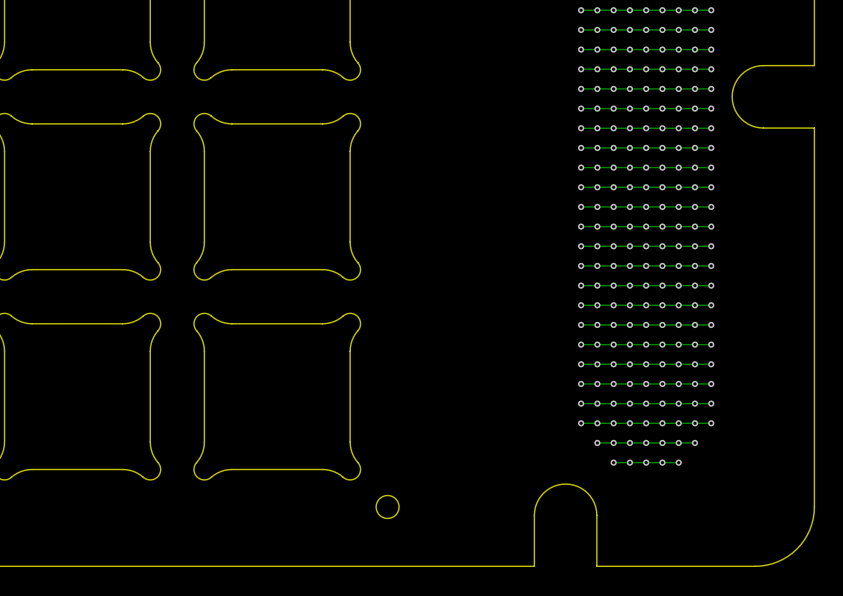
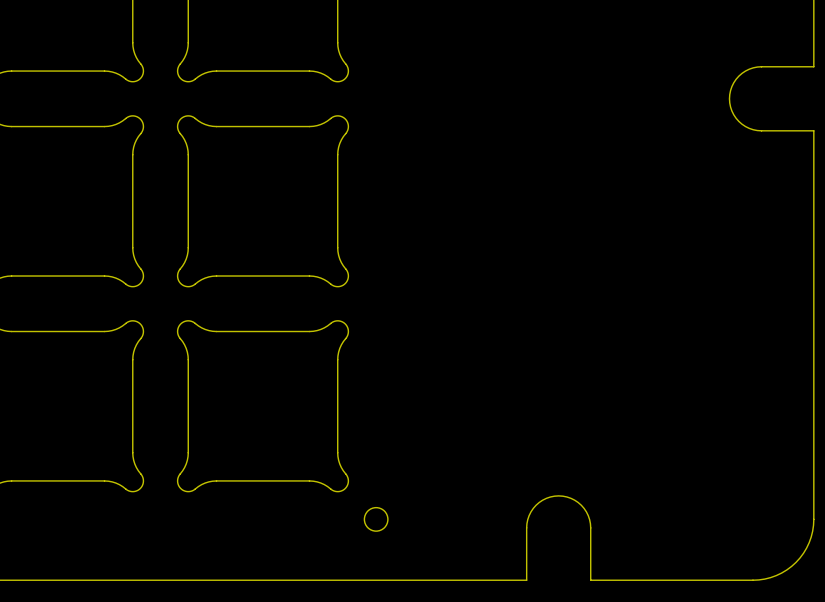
via: (581, 10) -> none
via: (597, 10) -> none
via: (613, 10) -> none
via: (629, 10) -> none
via: (646, 10) -> none
via: (662, 10) -> none
via: (678, 10) -> none
via: (694, 10) -> none
track: (711, 10) (581, 10) -> none
via: (711, 10) -> none
via: (581, 29) -> none
via: (597, 29) -> none
via: (613, 29) -> none
via: (629, 29) -> none
via: (646, 29) -> none
via: (662, 29) -> none
via: (678, 29) -> none
via: (694, 29) -> none
track: (711, 29) (581, 29) -> none
via: (711, 29) -> none
via: (581, 49) -> none
via: (597, 49) -> none
via: (613, 49) -> none
via: (629, 49) -> none
via: (646, 49) -> none
via: (662, 49) -> none
via: (678, 49) -> none
via: (694, 49) -> none
track: (711, 49) (581, 49) -> none
via: (711, 49) -> none
via: (581, 69) -> none
via: (597, 69) -> none
via: (613, 69) -> none
via: (629, 69) -> none
via: (646, 69) -> none
via: (662, 69) -> none
via: (678, 69) -> none
via: (694, 69) -> none
track: (711, 69) (581, 69) -> none
via: (711, 69) -> none
via: (581, 88) -> none
via: (597, 88) -> none
via: (613, 88) -> none
via: (629, 88) -> none
via: (646, 88) -> none
via: (662, 88) -> none
via: (678, 88) -> none
via: (694, 88) -> none
track: (711, 88) (581, 88) -> none
via: (711, 88) -> none
via: (581, 108) -> none
via: (597, 108) -> none
via: (613, 108) -> none
via: (629, 108) -> none
via: (646, 108) -> none
via: (662, 108) -> none
via: (678, 108) -> none
via: (694, 108) -> none
track: (711, 108) (581, 108) -> none
via: (711, 108) -> none
via: (581, 128) -> none
via: (597, 128) -> none
via: (613, 128) -> none
via: (629, 128) -> none
via: (646, 128) -> none
via: (662, 128) -> none
via: (678, 128) -> none
via: (694, 128) -> none
track: (711, 128) (581, 128) -> none
via: (711, 128) -> none
via: (581, 147) -> none
via: (597, 147) -> none
via: (613, 147) -> none
via: (629, 147) -> none
via: (646, 147) -> none
via: (662, 147) -> none
via: (678, 147) -> none
via: (694, 147) -> none
track: (711, 147) (581, 147) -> none
via: (711, 147) -> none
via: (581, 167) -> none
via: (597, 167) -> none
via: (613, 167) -> none
via: (629, 167) -> none
via: (646, 167) -> none
via: (662, 167) -> none
via: (678, 167) -> none
via: (694, 167) -> none
track: (711, 167) (581, 167) -> none
via: (711, 167) -> none
via: (581, 187) -> none
via: (597, 187) -> none
via: (613, 187) -> none
via: (629, 187) -> none
via: (646, 187) -> none
via: (662, 187) -> none
via: (678, 187) -> none
via: (694, 187) -> none
track: (711, 187) (581, 187) -> none
via: (711, 187) -> none
via: (581, 206) -> none
via: (597, 206) -> none
via: (613, 206) -> none
via: (629, 206) -> none
via: (646, 206) -> none
via: (662, 206) -> none
via: (678, 206) -> none
via: (694, 206) -> none
track: (711, 206) (581, 206) -> none
via: (711, 206) -> none
via: (581, 226) -> none
via: (597, 226) -> none
via: (613, 226) -> none
via: (629, 226) -> none
via: (646, 226) -> none
via: (662, 226) -> none
via: (678, 226) -> none
via: (694, 226) -> none
track: (711, 226) (581, 226) -> none
via: (711, 226) -> none
via: (581, 246) -> none
via: (597, 246) -> none
via: (613, 246) -> none
via: (629, 246) -> none
via: (646, 246) -> none
via: (662, 246) -> none
via: (678, 246) -> none
via: (694, 246) -> none
track: (711, 246) (581, 246) -> none
via: (711, 246) -> none
via: (581, 265) -> none
via: (597, 265) -> none
via: (613, 265) -> none
via: (629, 265) -> none
via: (646, 265) -> none
via: (662, 265) -> none
via: (678, 265) -> none
via: (694, 265) -> none
track: (711, 265) (581, 265) -> none
via: (711, 265) -> none
via: (581, 285) -> none
via: (597, 285) -> none
via: (613, 285) -> none
via: (629, 285) -> none
via: (646, 285) -> none
via: (662, 285) -> none
via: (678, 285) -> none
via: (694, 285) -> none
track: (711, 285) (581, 285) -> none
via: (711, 285) -> none
via: (581, 305) -> none
via: (597, 305) -> none
via: (613, 305) -> none
via: (629, 305) -> none
via: (646, 305) -> none
via: (662, 305) -> none
via: (678, 305) -> none
via: (694, 305) -> none
track: (711, 305) (581, 305) -> none
via: (711, 305) -> none
via: (581, 324) -> none
via: (597, 324) -> none
via: (613, 324) -> none
via: (629, 324) -> none
via: (646, 324) -> none
via: (662, 324) -> none
via: (678, 324) -> none
via: (694, 324) -> none
track: (711, 324) (581, 324) -> none
via: (711, 324) -> none
via: (581, 344) -> none
via: (597, 344) -> none
via: (613, 344) -> none
via: (629, 344) -> none
via: (646, 344) -> none
via: (662, 344) -> none
via: (678, 344) -> none
via: (694, 344) -> none
track: (711, 344) (581, 344) -> none
via: (711, 344) -> none
via: (581, 364) -> none
via: (597, 364) -> none
via: (613, 364) -> none
via: (629, 364) -> none
via: (646, 364) -> none
via: (662, 364) -> none
via: (678, 364) -> none
via: (694, 364) -> none
track: (711, 364) (581, 364) -> none
via: (711, 364) -> none
via: (581, 383) -> none
via: (597, 383) -> none
via: (613, 383) -> none
via: (629, 383) -> none
via: (646, 383) -> none
via: (662, 383) -> none
via: (678, 383) -> none
via: (694, 383) -> none
track: (711, 383) (581, 383) -> none
via: (711, 383) -> none
via: (581, 403) -> none
via: (597, 403) -> none
via: (613, 403) -> none
via: (629, 403) -> none
via: (646, 403) -> none
via: (662, 403) -> none
via: (678, 403) -> none
via: (694, 403) -> none
track: (711, 403) (581, 403) -> none
via: (711, 403) -> none
via: (581, 423) -> none
via: (597, 423) -> none
via: (613, 423) -> none
via: (629, 423) -> none
via: (646, 423) -> none
via: (662, 423) -> none
via: (678, 423) -> none
via: (694, 423) -> none
track: (711, 423) (581, 423) -> none
via: (711, 423) -> none
via: (597, 442) -> none
via: (613, 442) -> none
via: (629, 442) -> none
via: (646, 442) -> none
via: (662, 442) -> none
via: (678, 442) -> none
track: (694, 442) (597, 442) -> none
via: (694, 442) -> none
via: (613, 462) -> none
via: (629, 462) -> none
via: (646, 462) -> none
via: (662, 462) -> none
track: (678, 462) (613, 462) -> none
via: (678, 462) -> none

